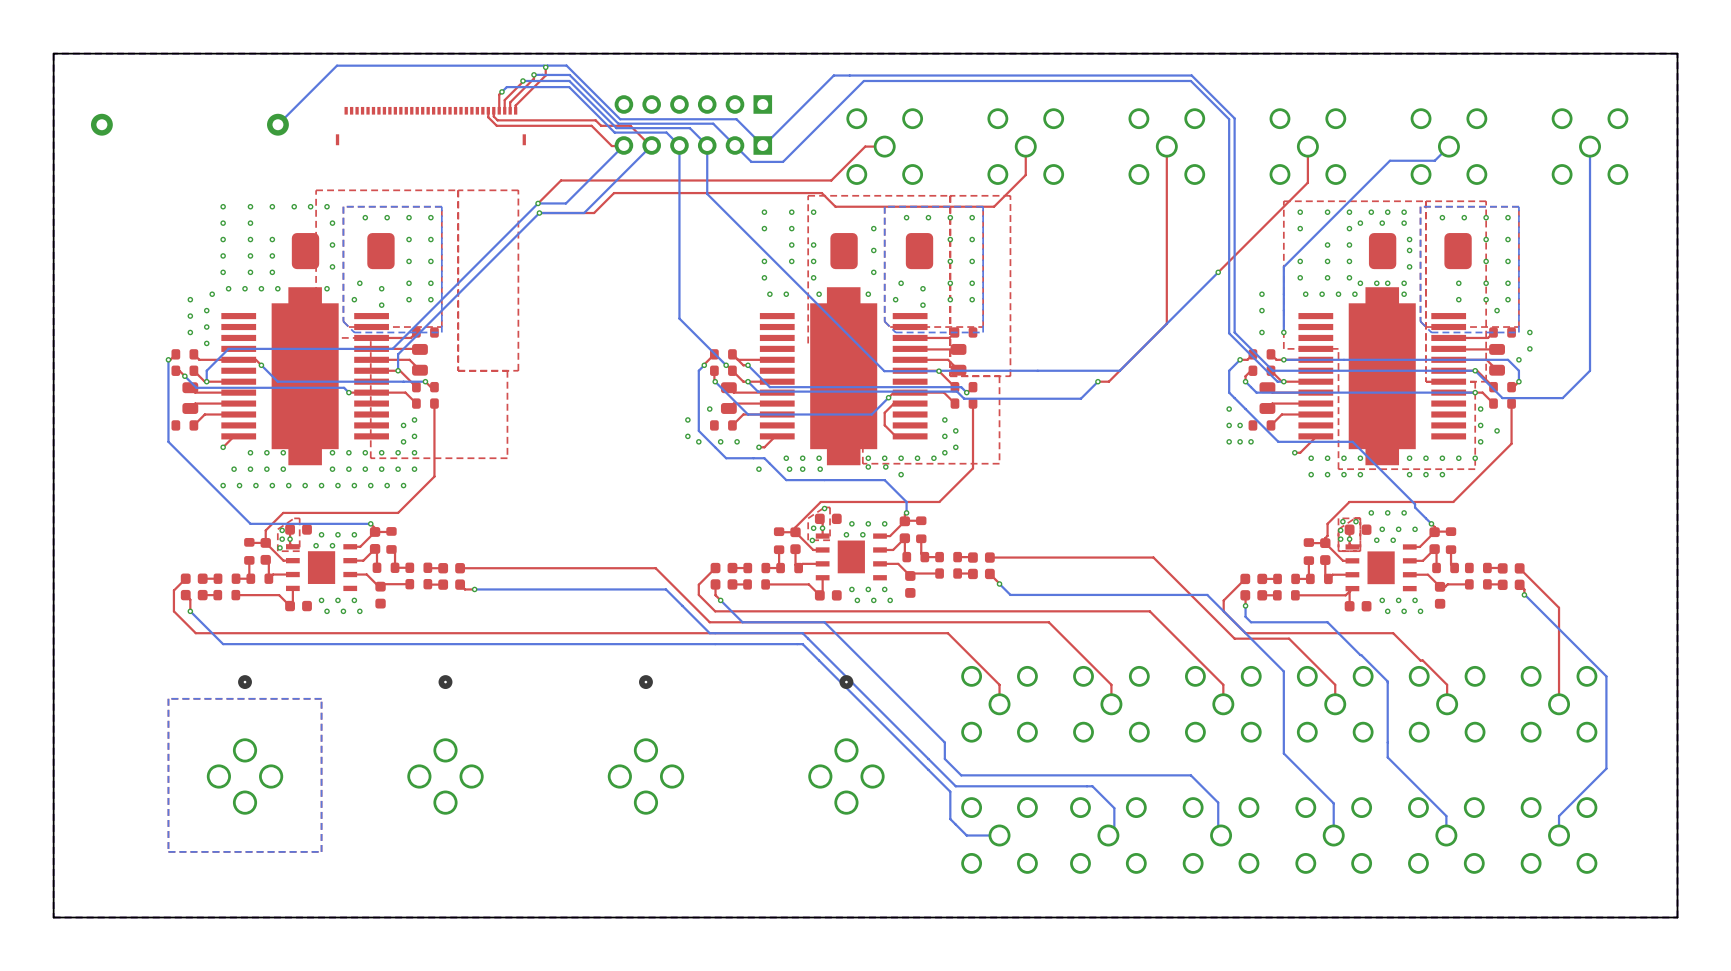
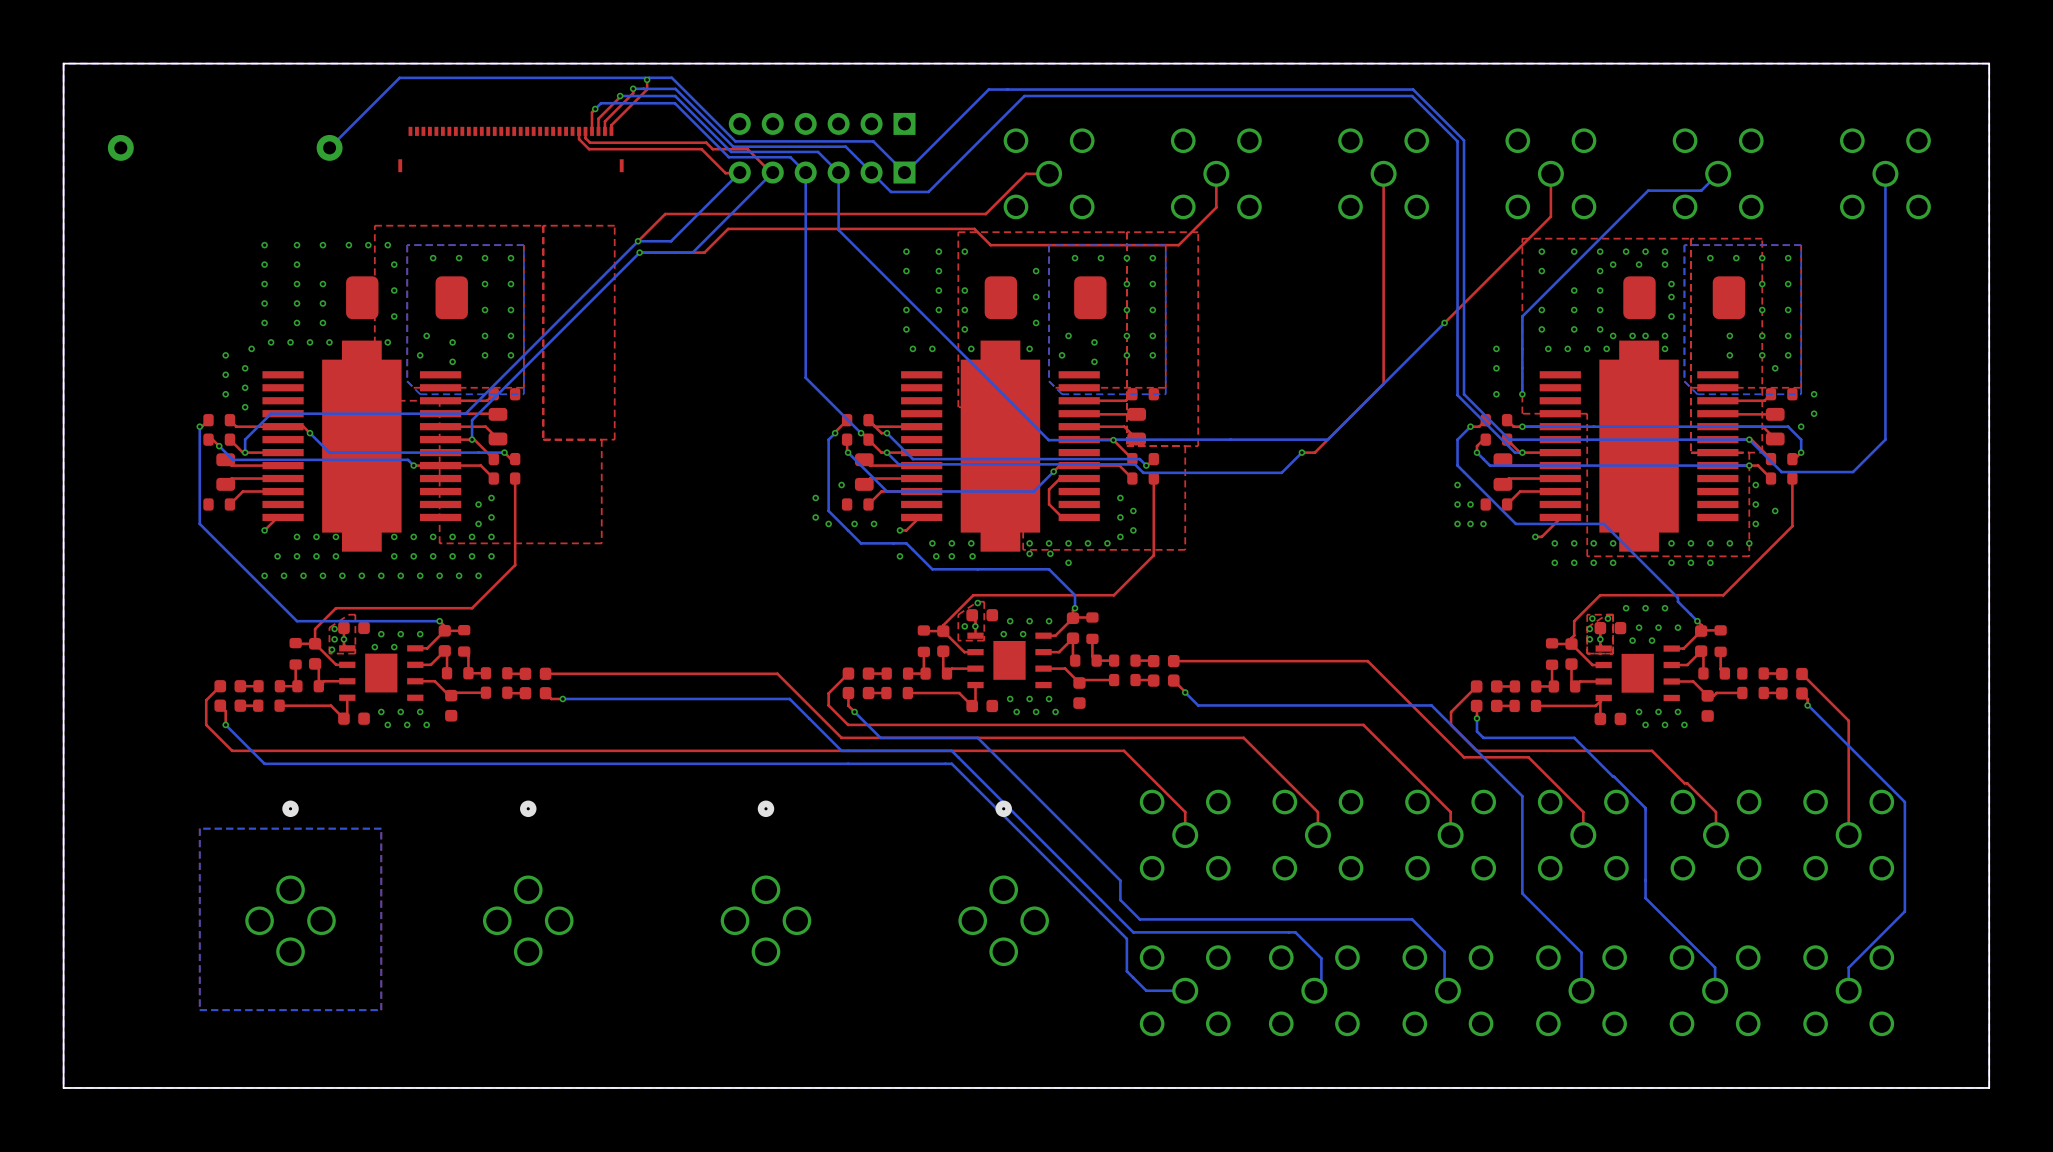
via: (812, 540) -> none

